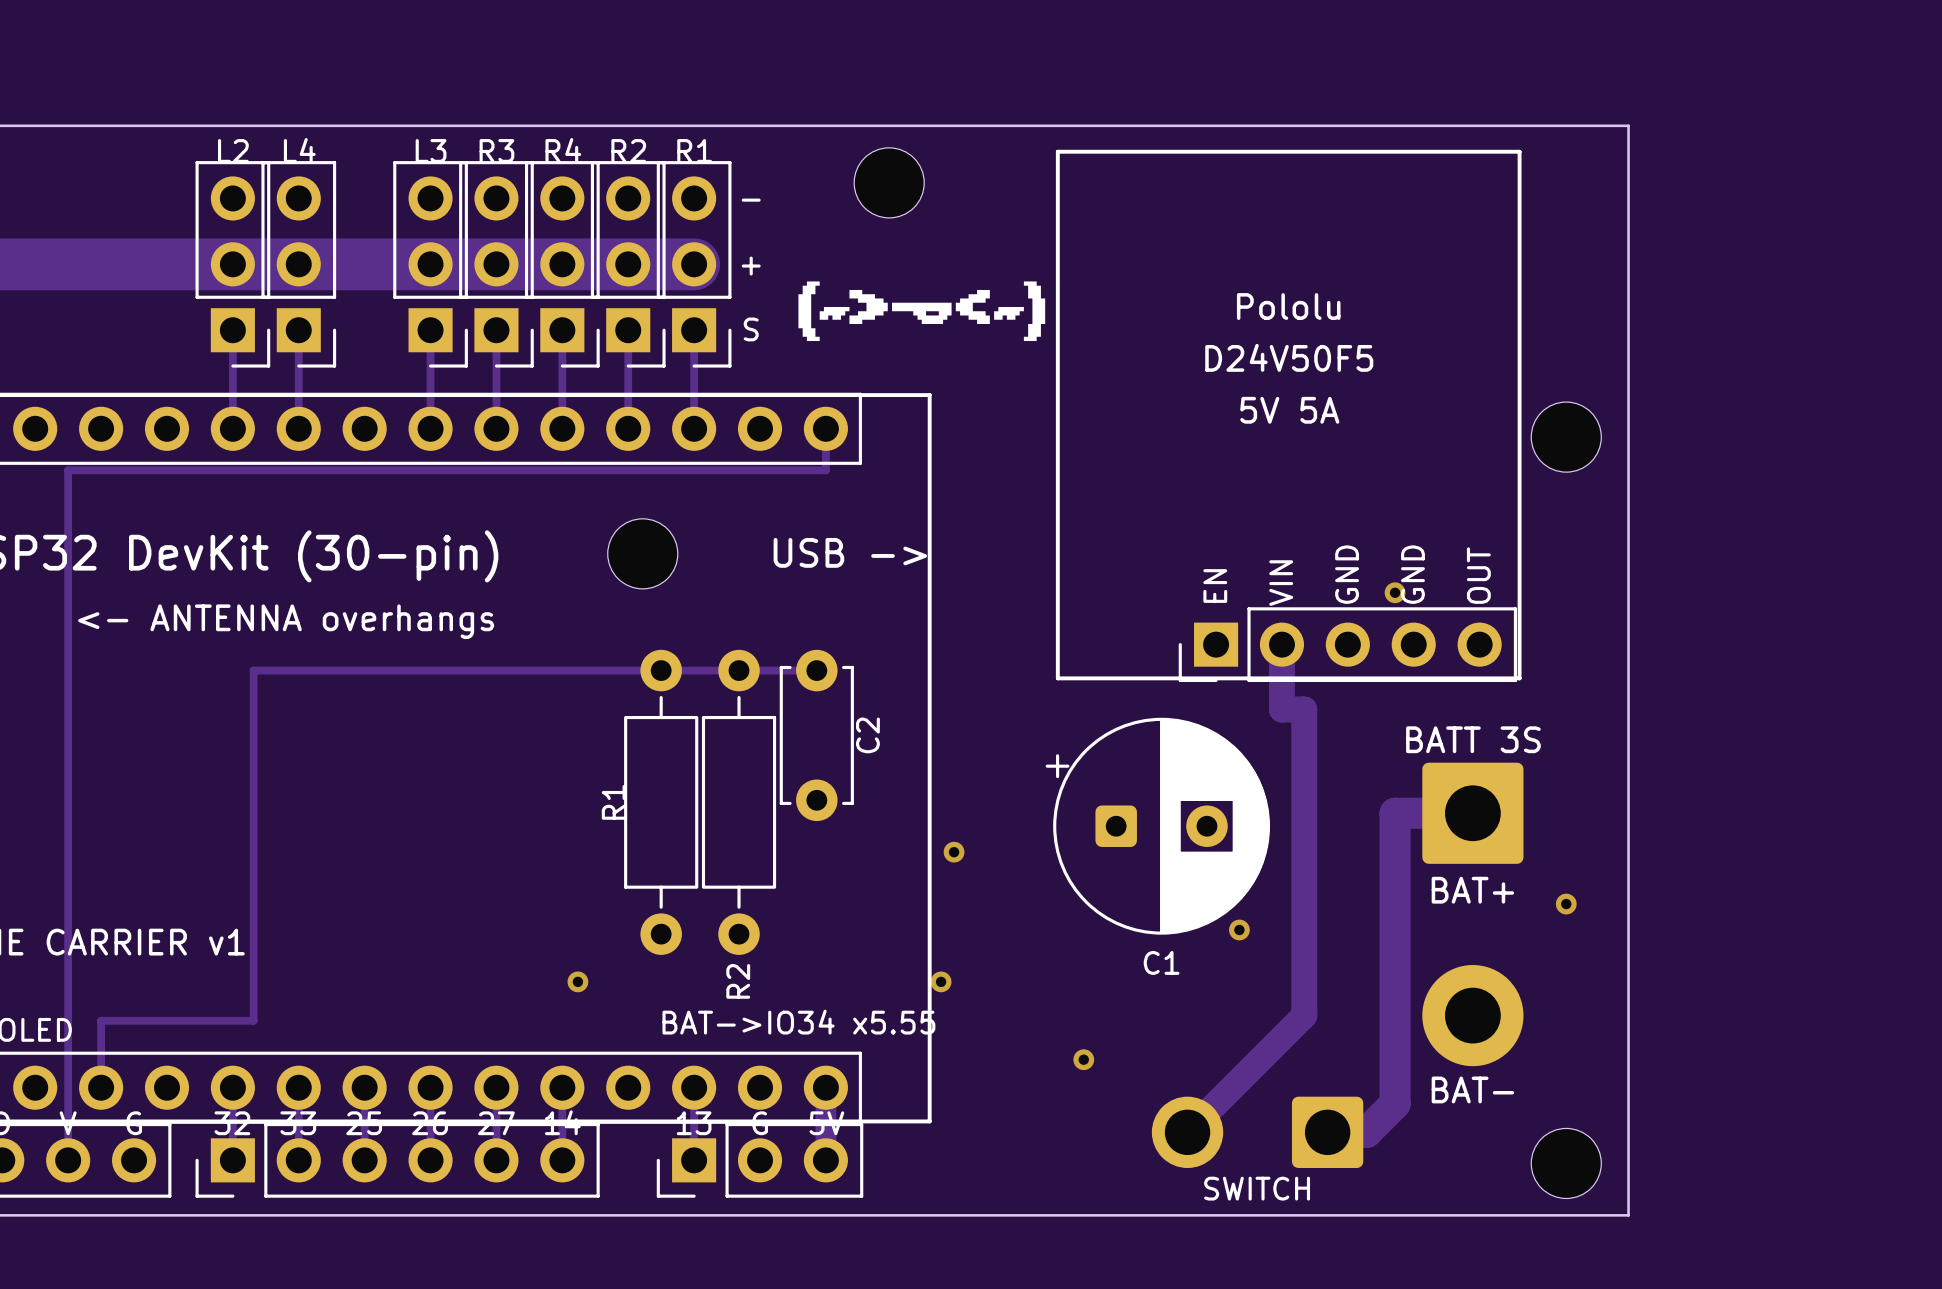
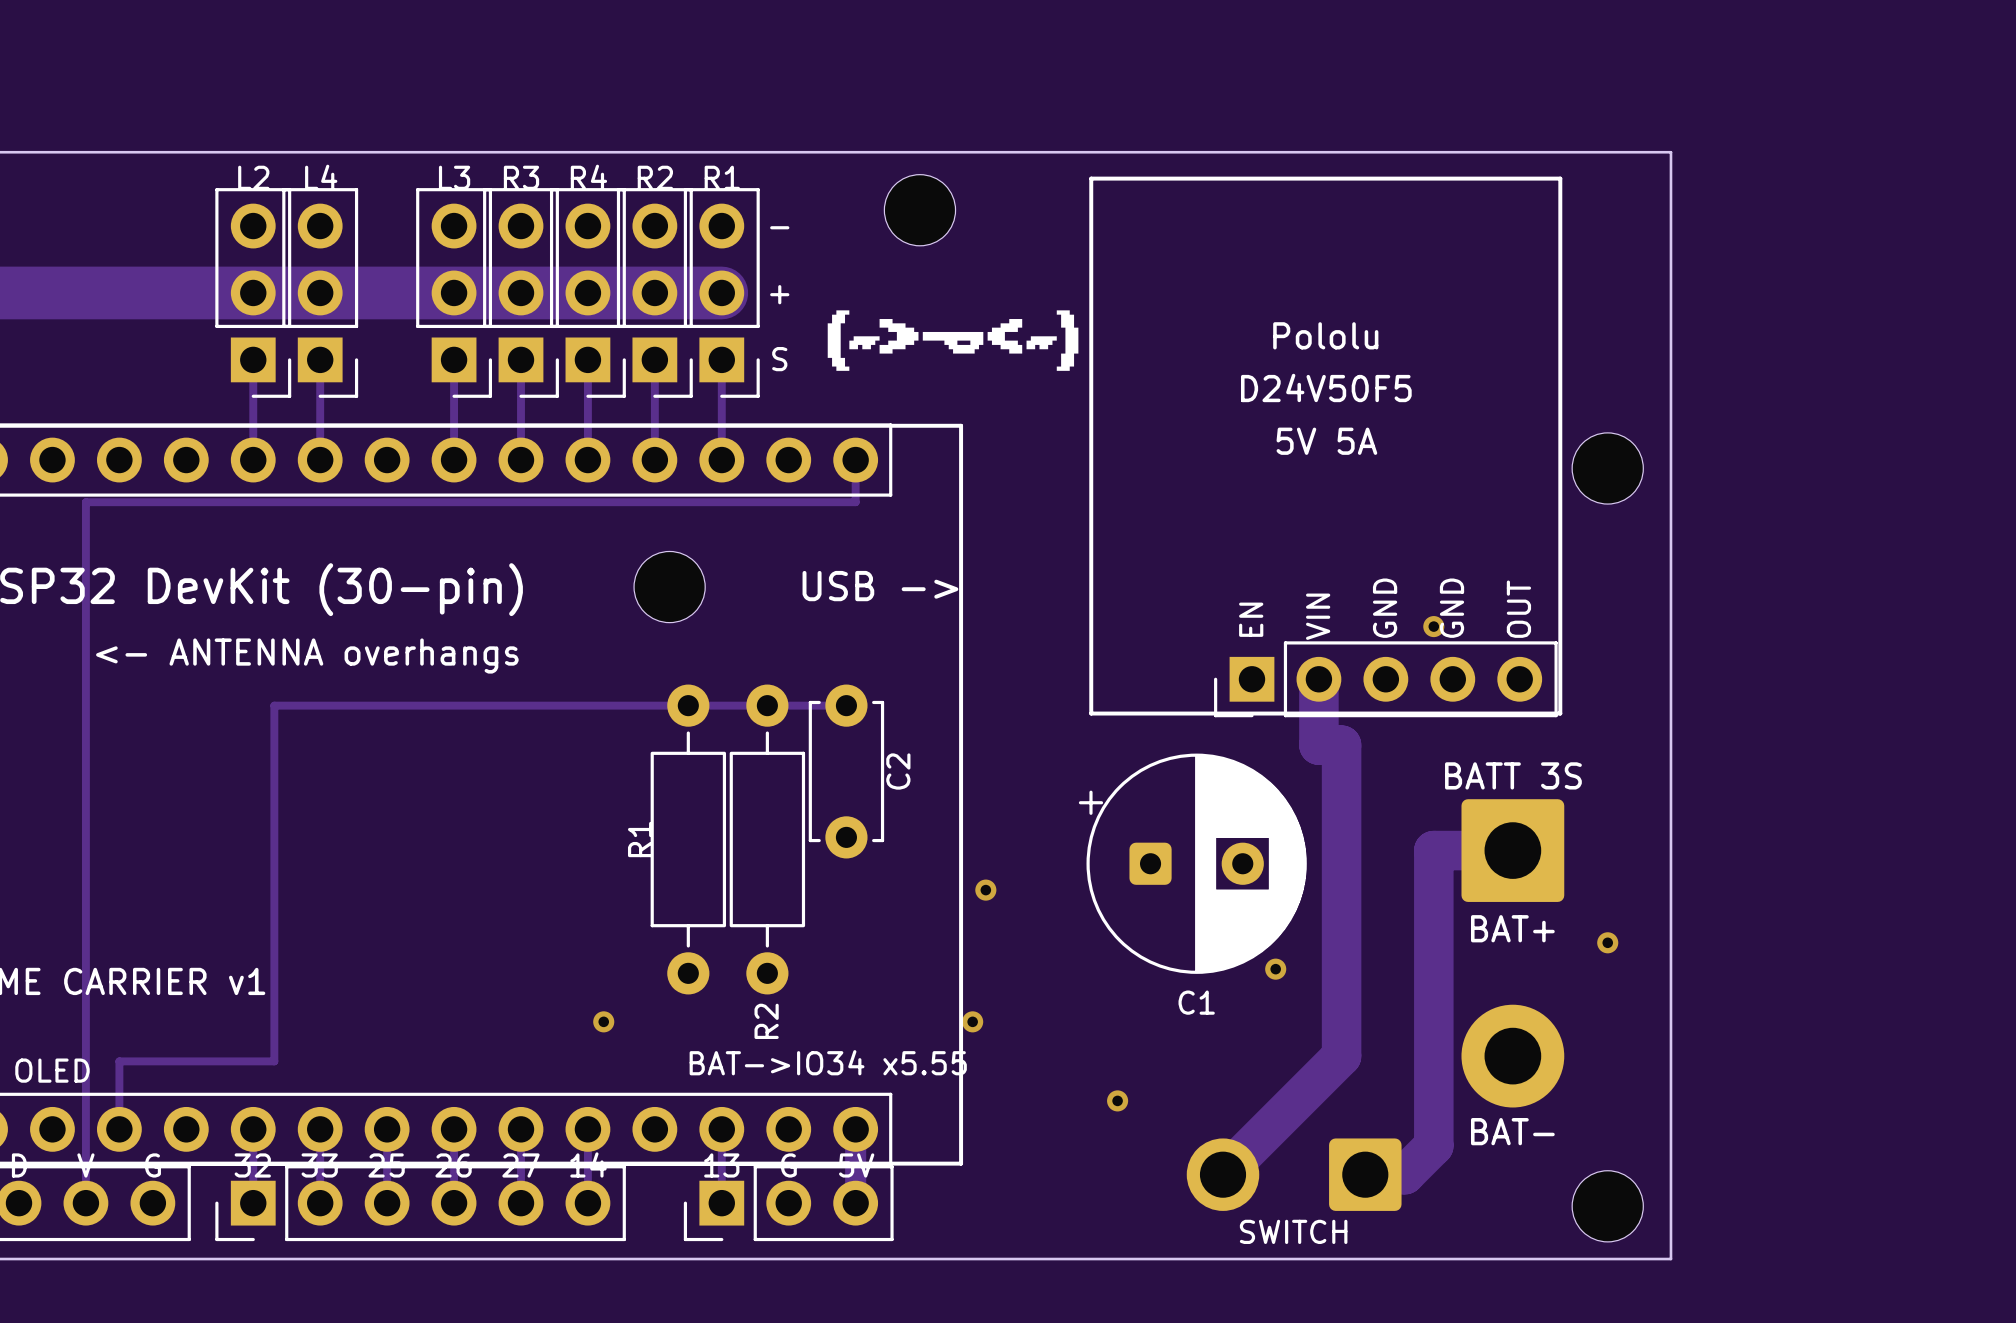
track width: thin (1281, 644) (1281, 709) (1304, 709) (1304, 1015) (1187, 1132) -> thick (1318, 679) (1318, 745) (1341, 745) (1341, 1056) (1223, 1174)
track width: thin (1472, 813) (1395, 813) (1395, 1103) (1366, 1132) (1327, 1132) -> thick (1512, 850) (1433, 850) (1433, 1145) (1404, 1174) (1365, 1174)

